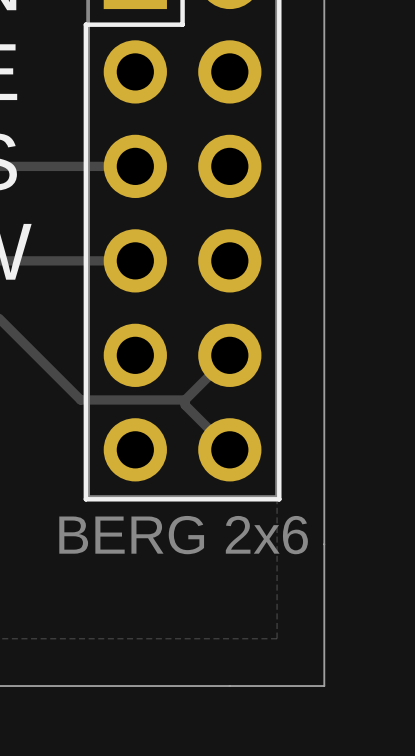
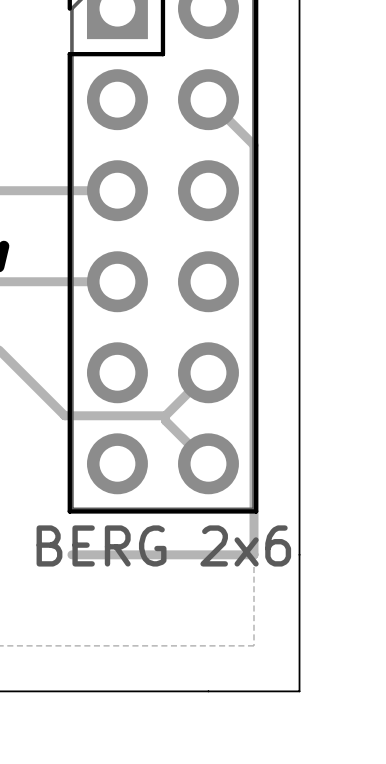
track: none -> (208, 99) (254, 145) (254, 554) (71, 554)

